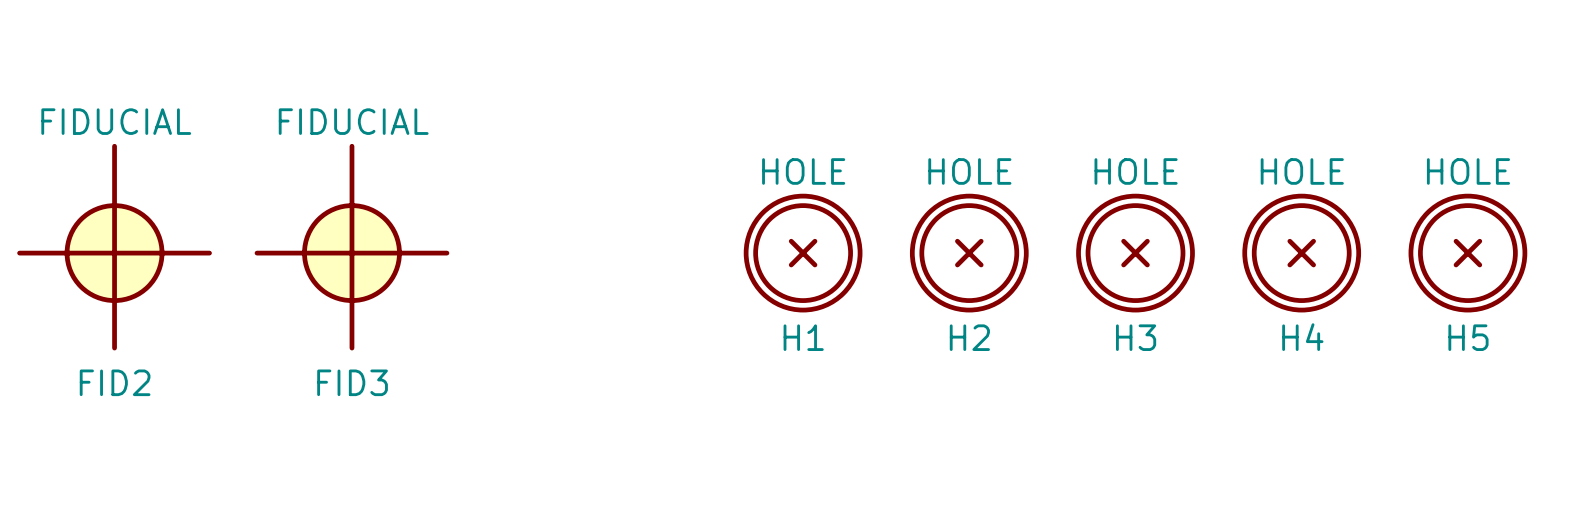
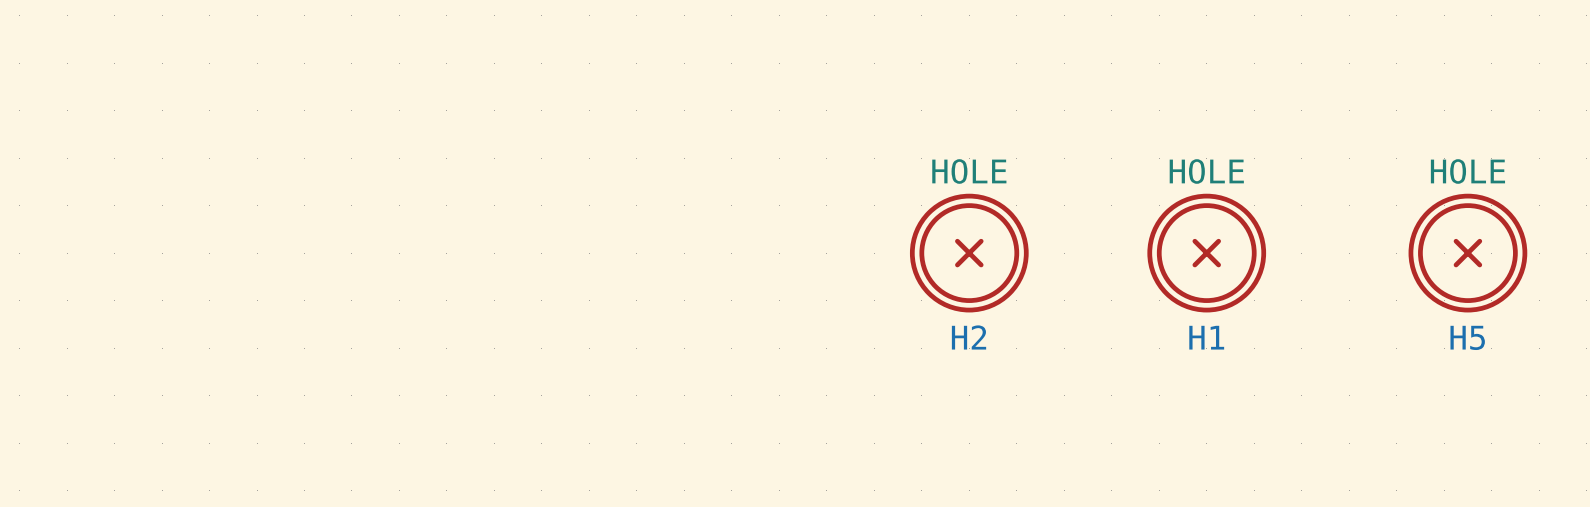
FID2: FIDUCIAL (114, 247) -> none
FID3: FIDUCIAL (351, 247) -> none
H1 position: (803, 253) -> (1206, 253)
H3: HOLE (1135, 253) -> none
H4: HOLE (1301, 253) -> none

